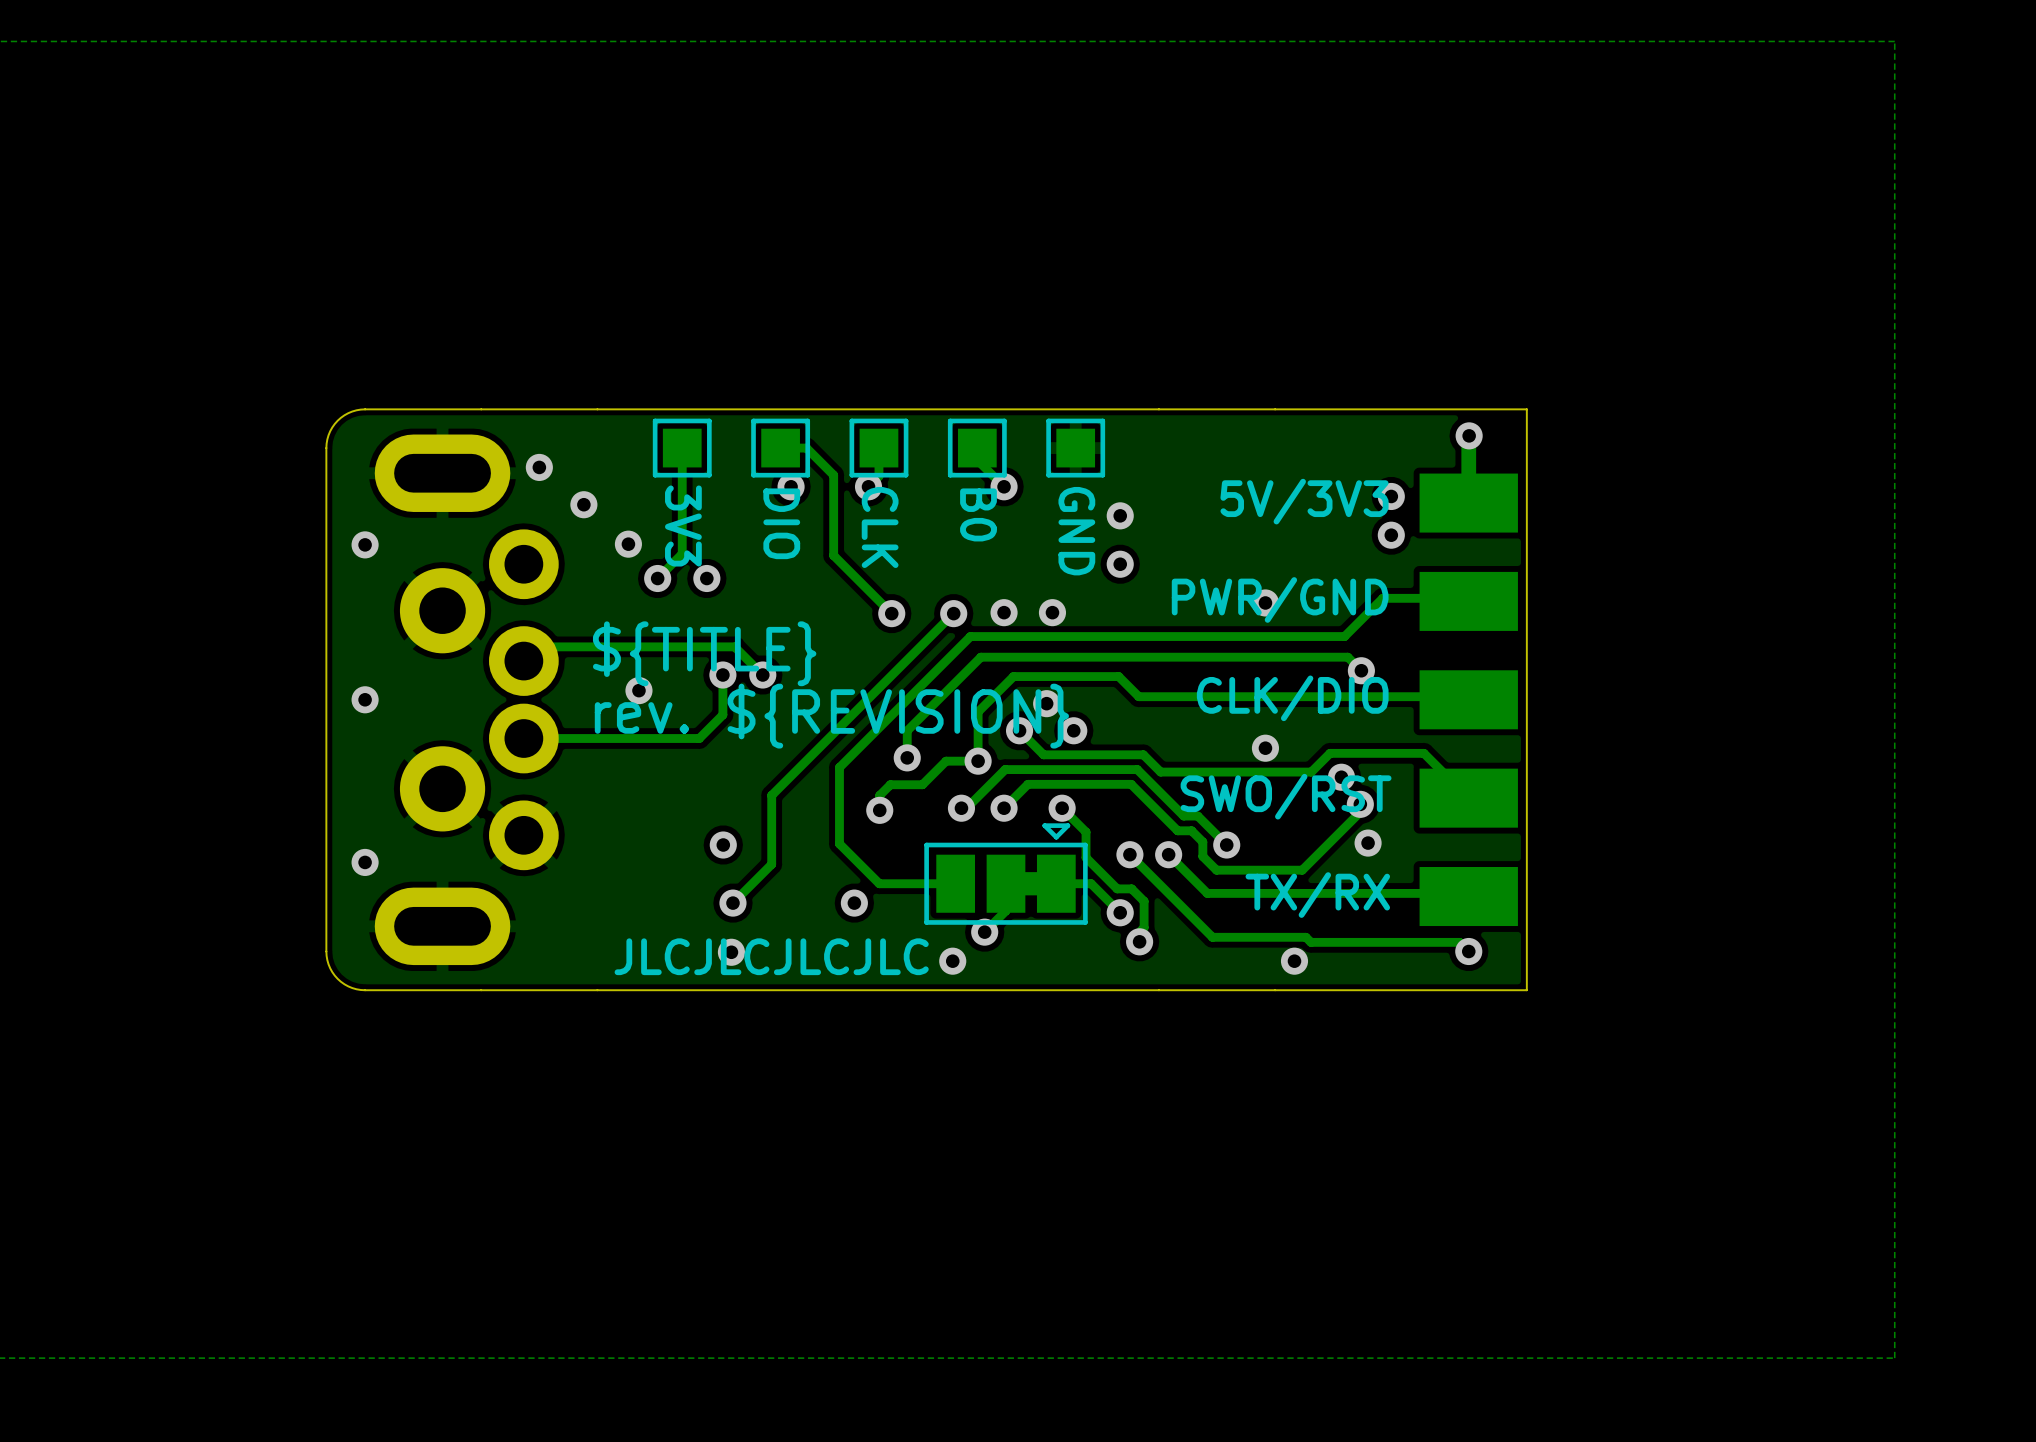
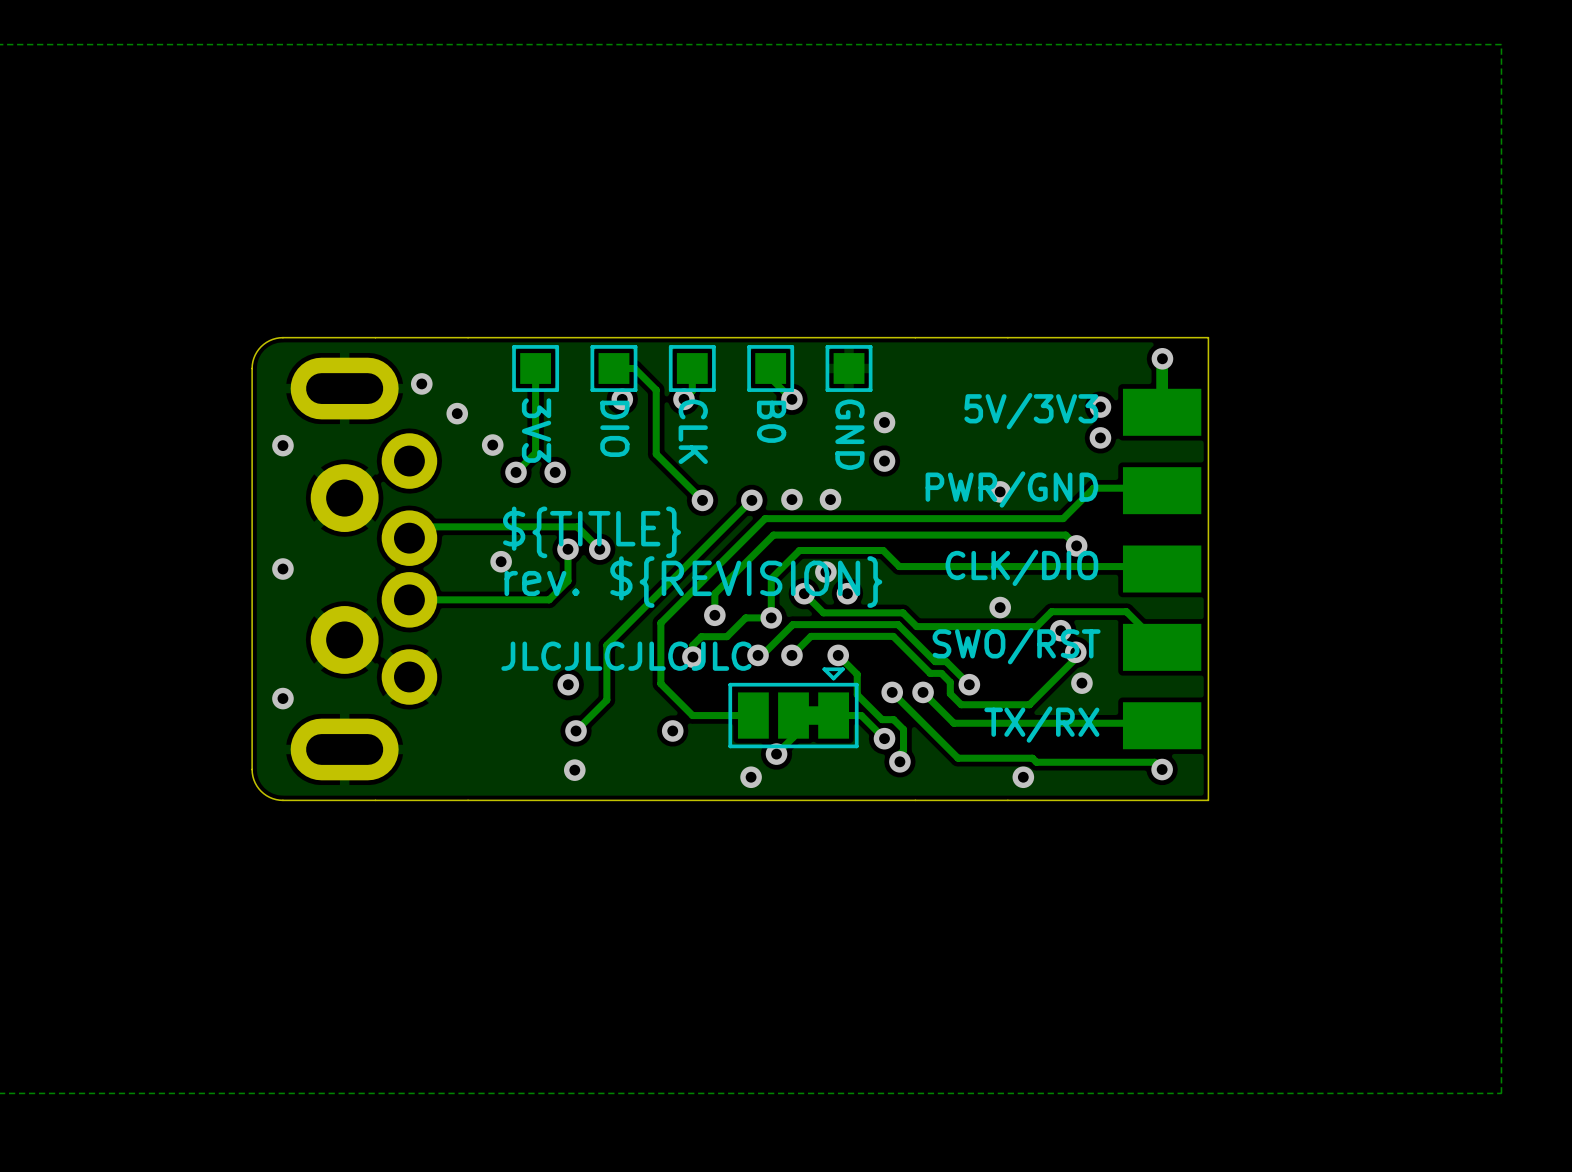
text position: ${TITLE} (704, 653) -> ${TITLE} (592, 532)
text position: rev. ${REVISION} (831, 716) -> rev. ${REVISION} (693, 582)
text position: JLCJLCJLCJLC (771, 956) -> JLCJLCJLCJLC (626, 656)

